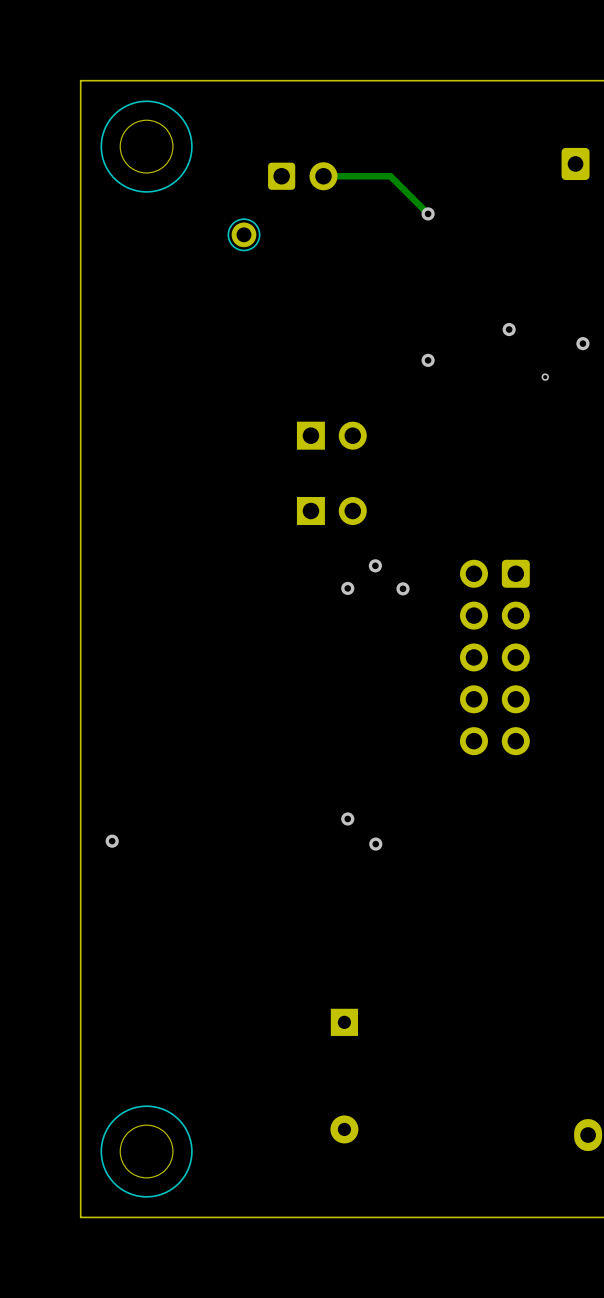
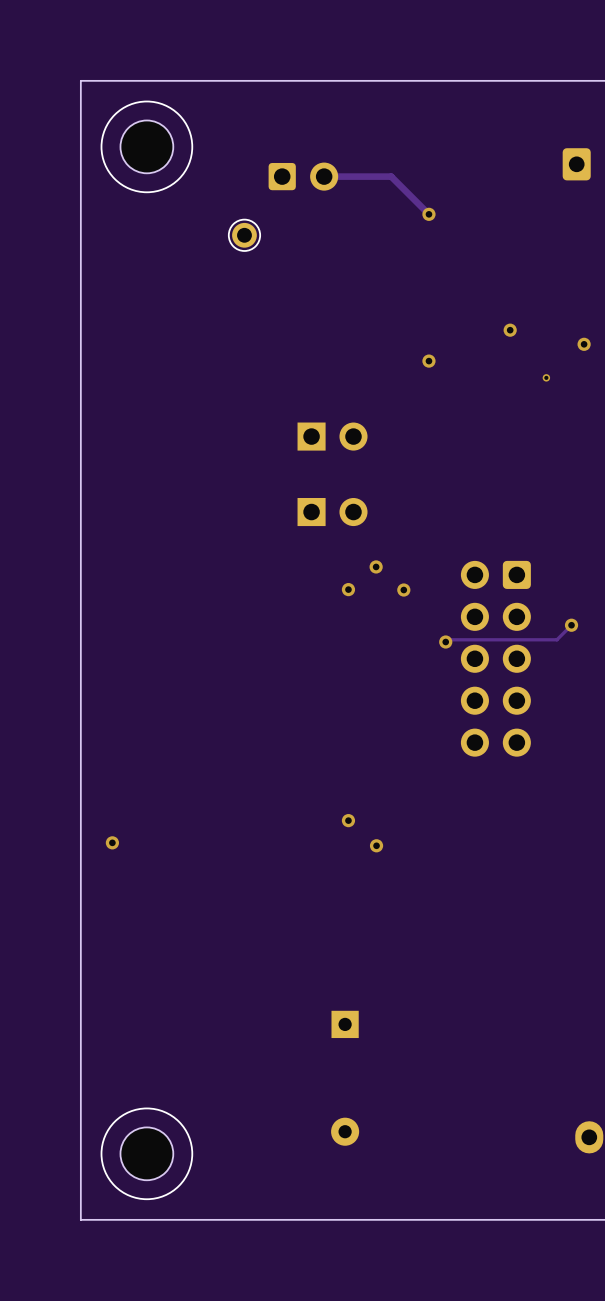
track: none -> (571, 625) (556, 639) (447, 639) (445, 642)
via: none -> (571, 625)
via: none -> (445, 642)

